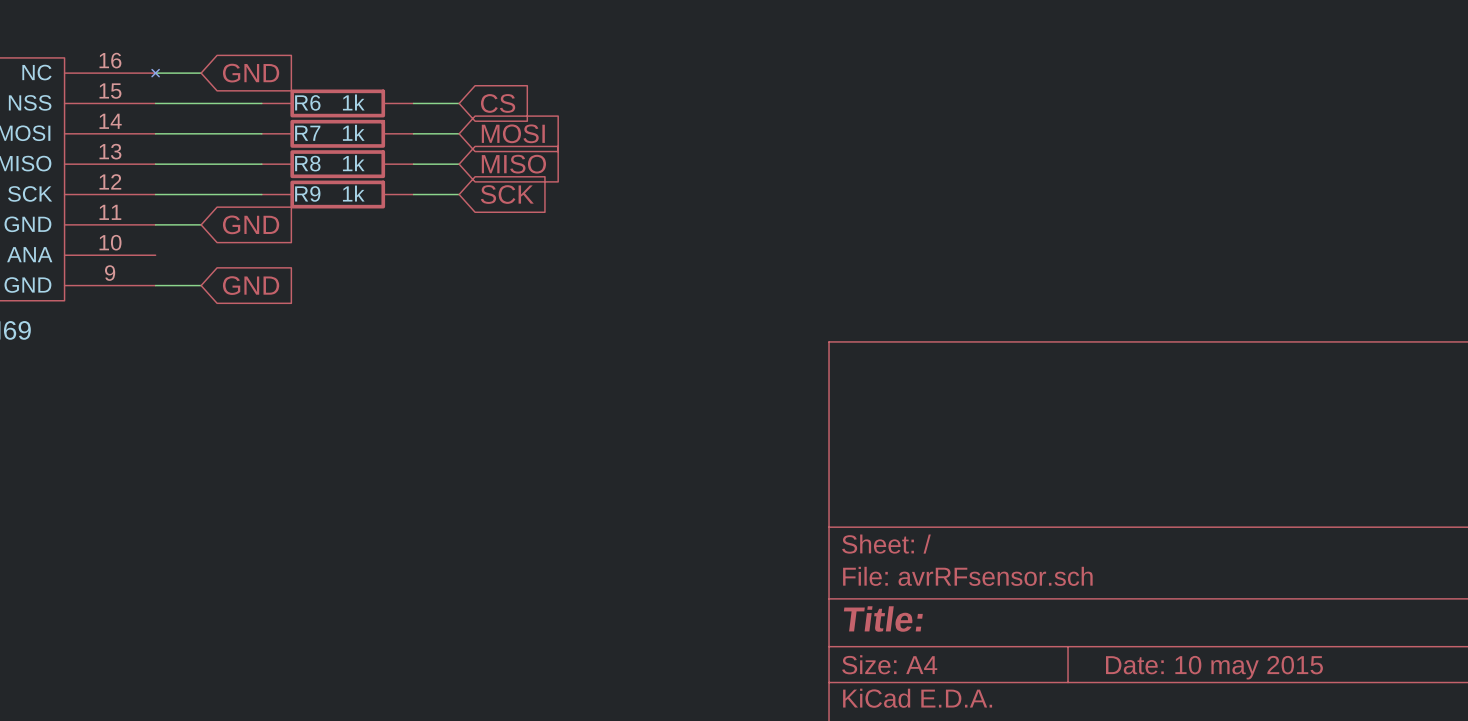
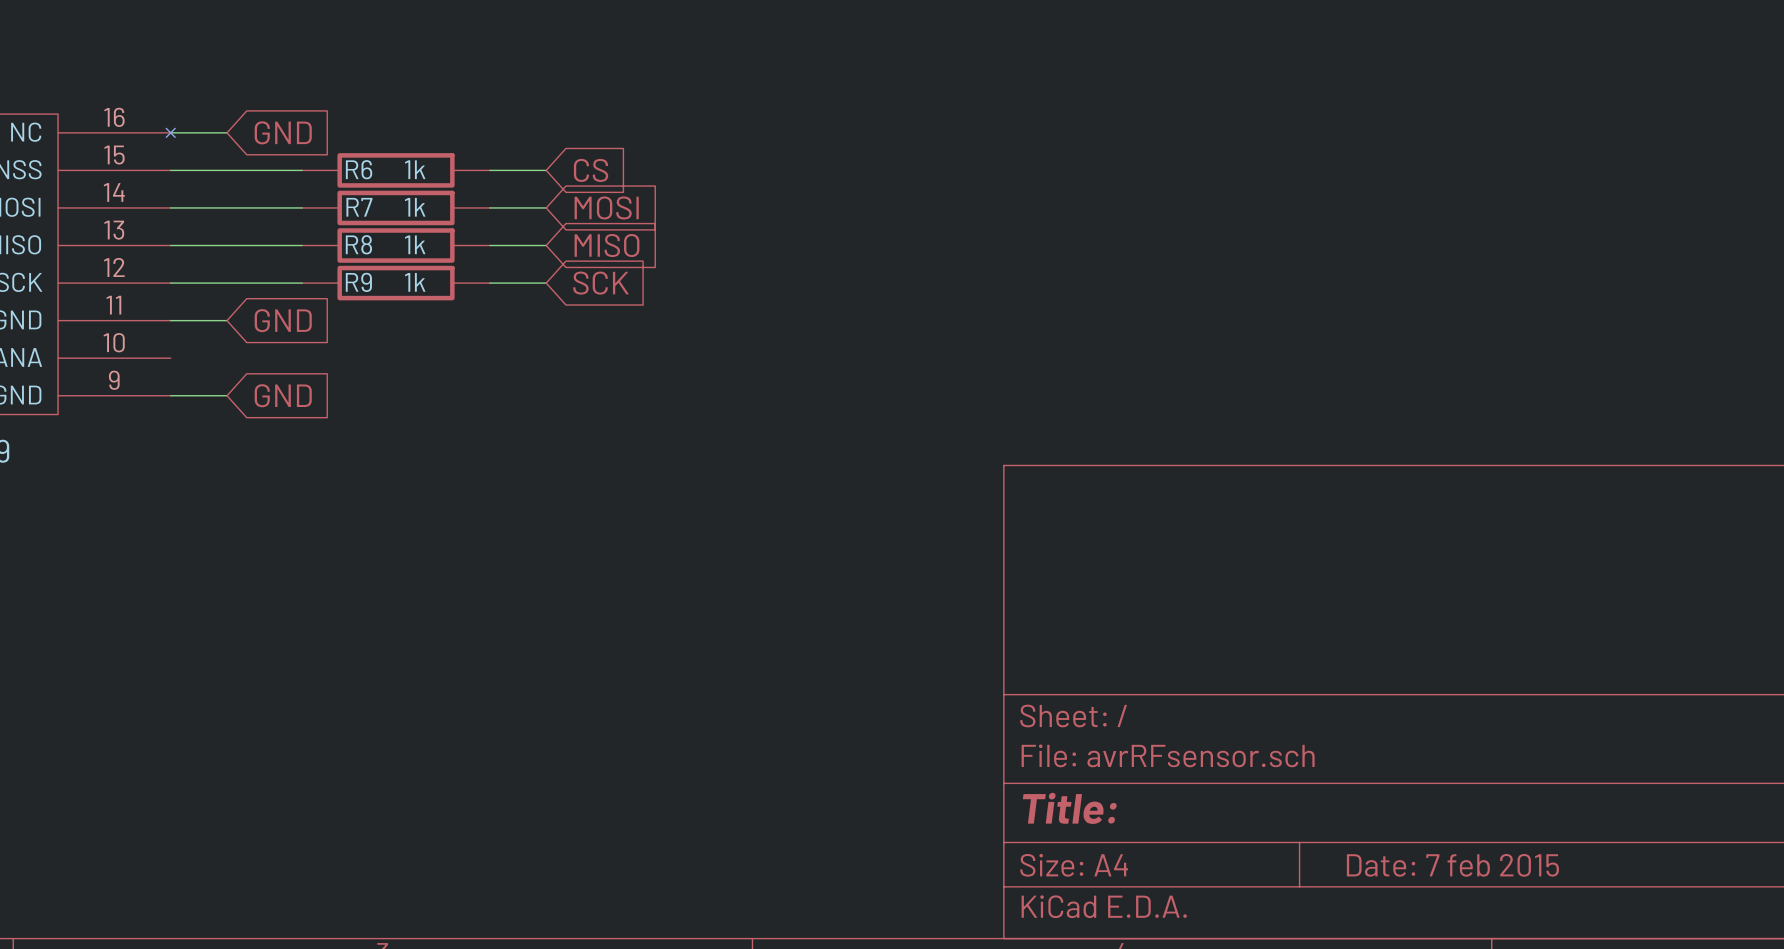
title block: Date: 10 may 2015 (1214, 667) -> Date: 7 feb 2015 (1452, 865)

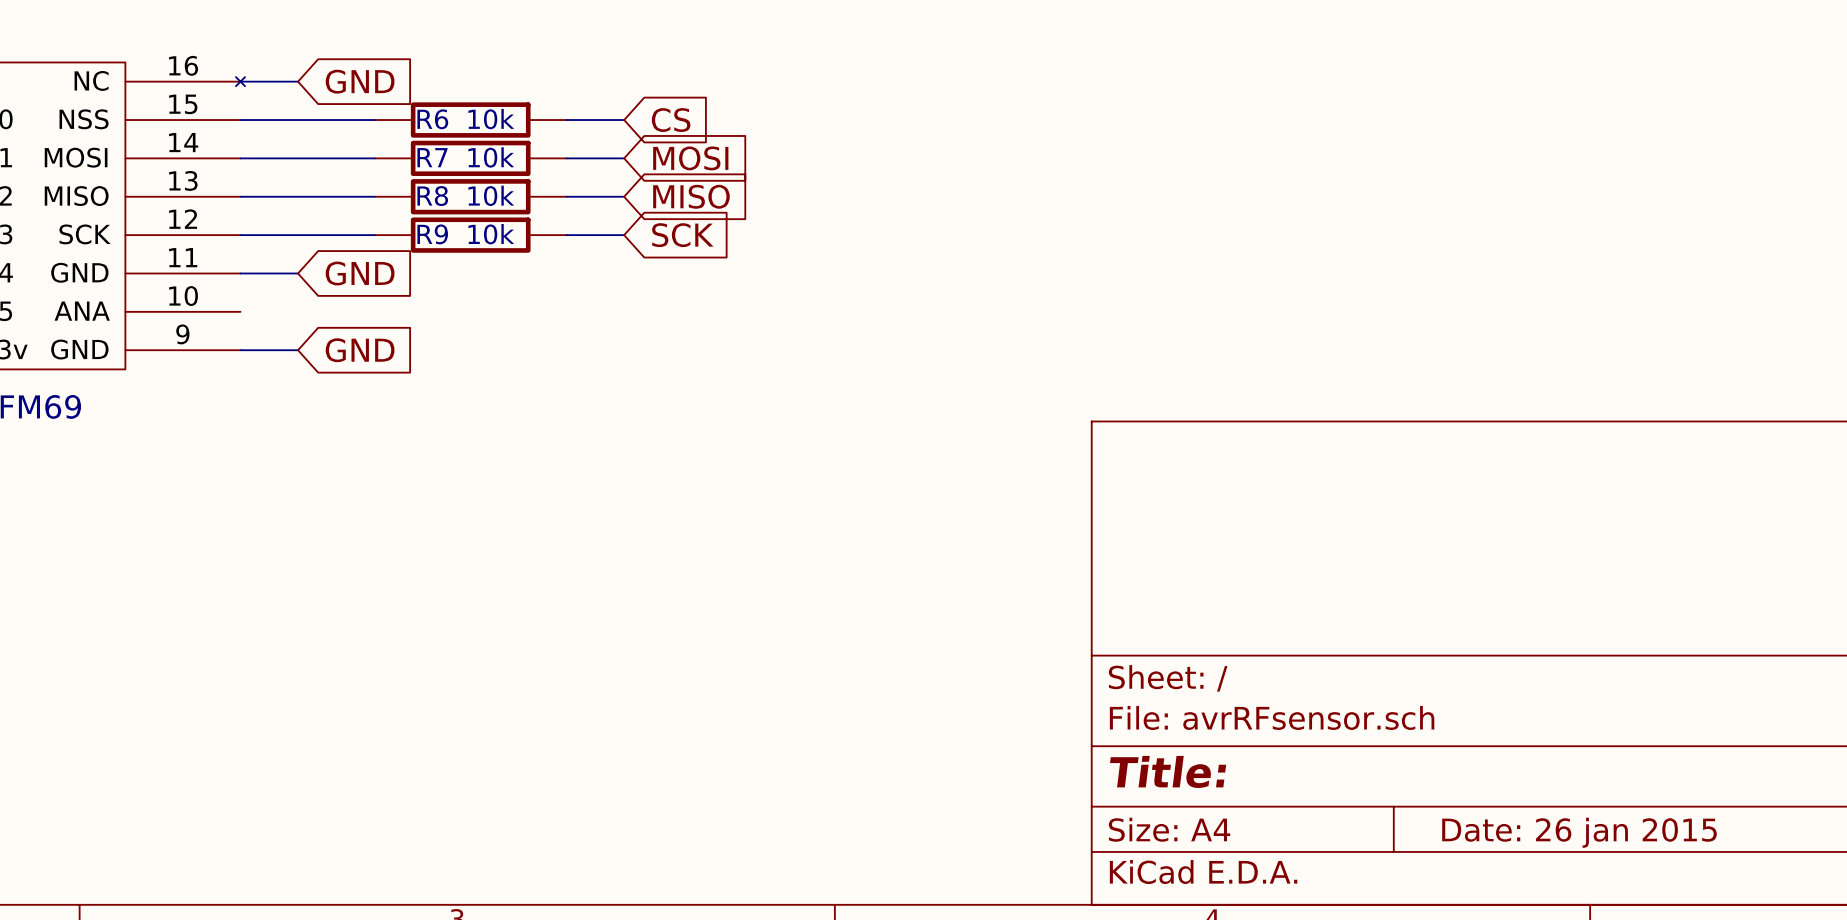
R6 value: 1k (415, 169) -> 10k (491, 119)
R7 value: 1k (415, 207) -> 10k (491, 157)
R8 value: 1k (415, 244) -> 10k (491, 195)
R9 value: 1k (415, 282) -> 10k (491, 234)
title block: Date: 7 feb 2015 (1452, 865) -> Date: 26 jan 2015 (1579, 832)

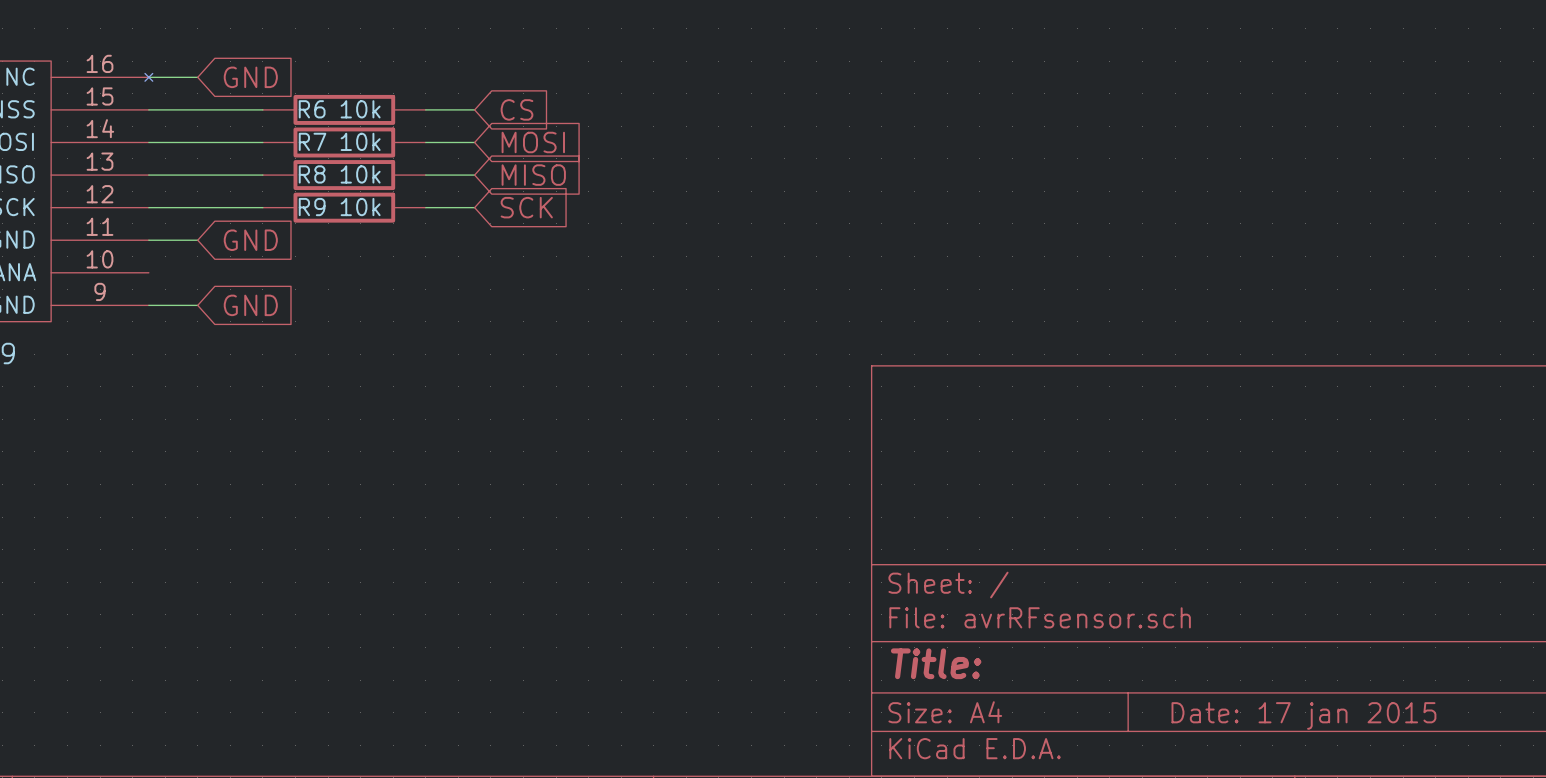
title block: Date: 26 jan 2015 (1579, 832) -> Date: 17 jan 2015 (1303, 715)

